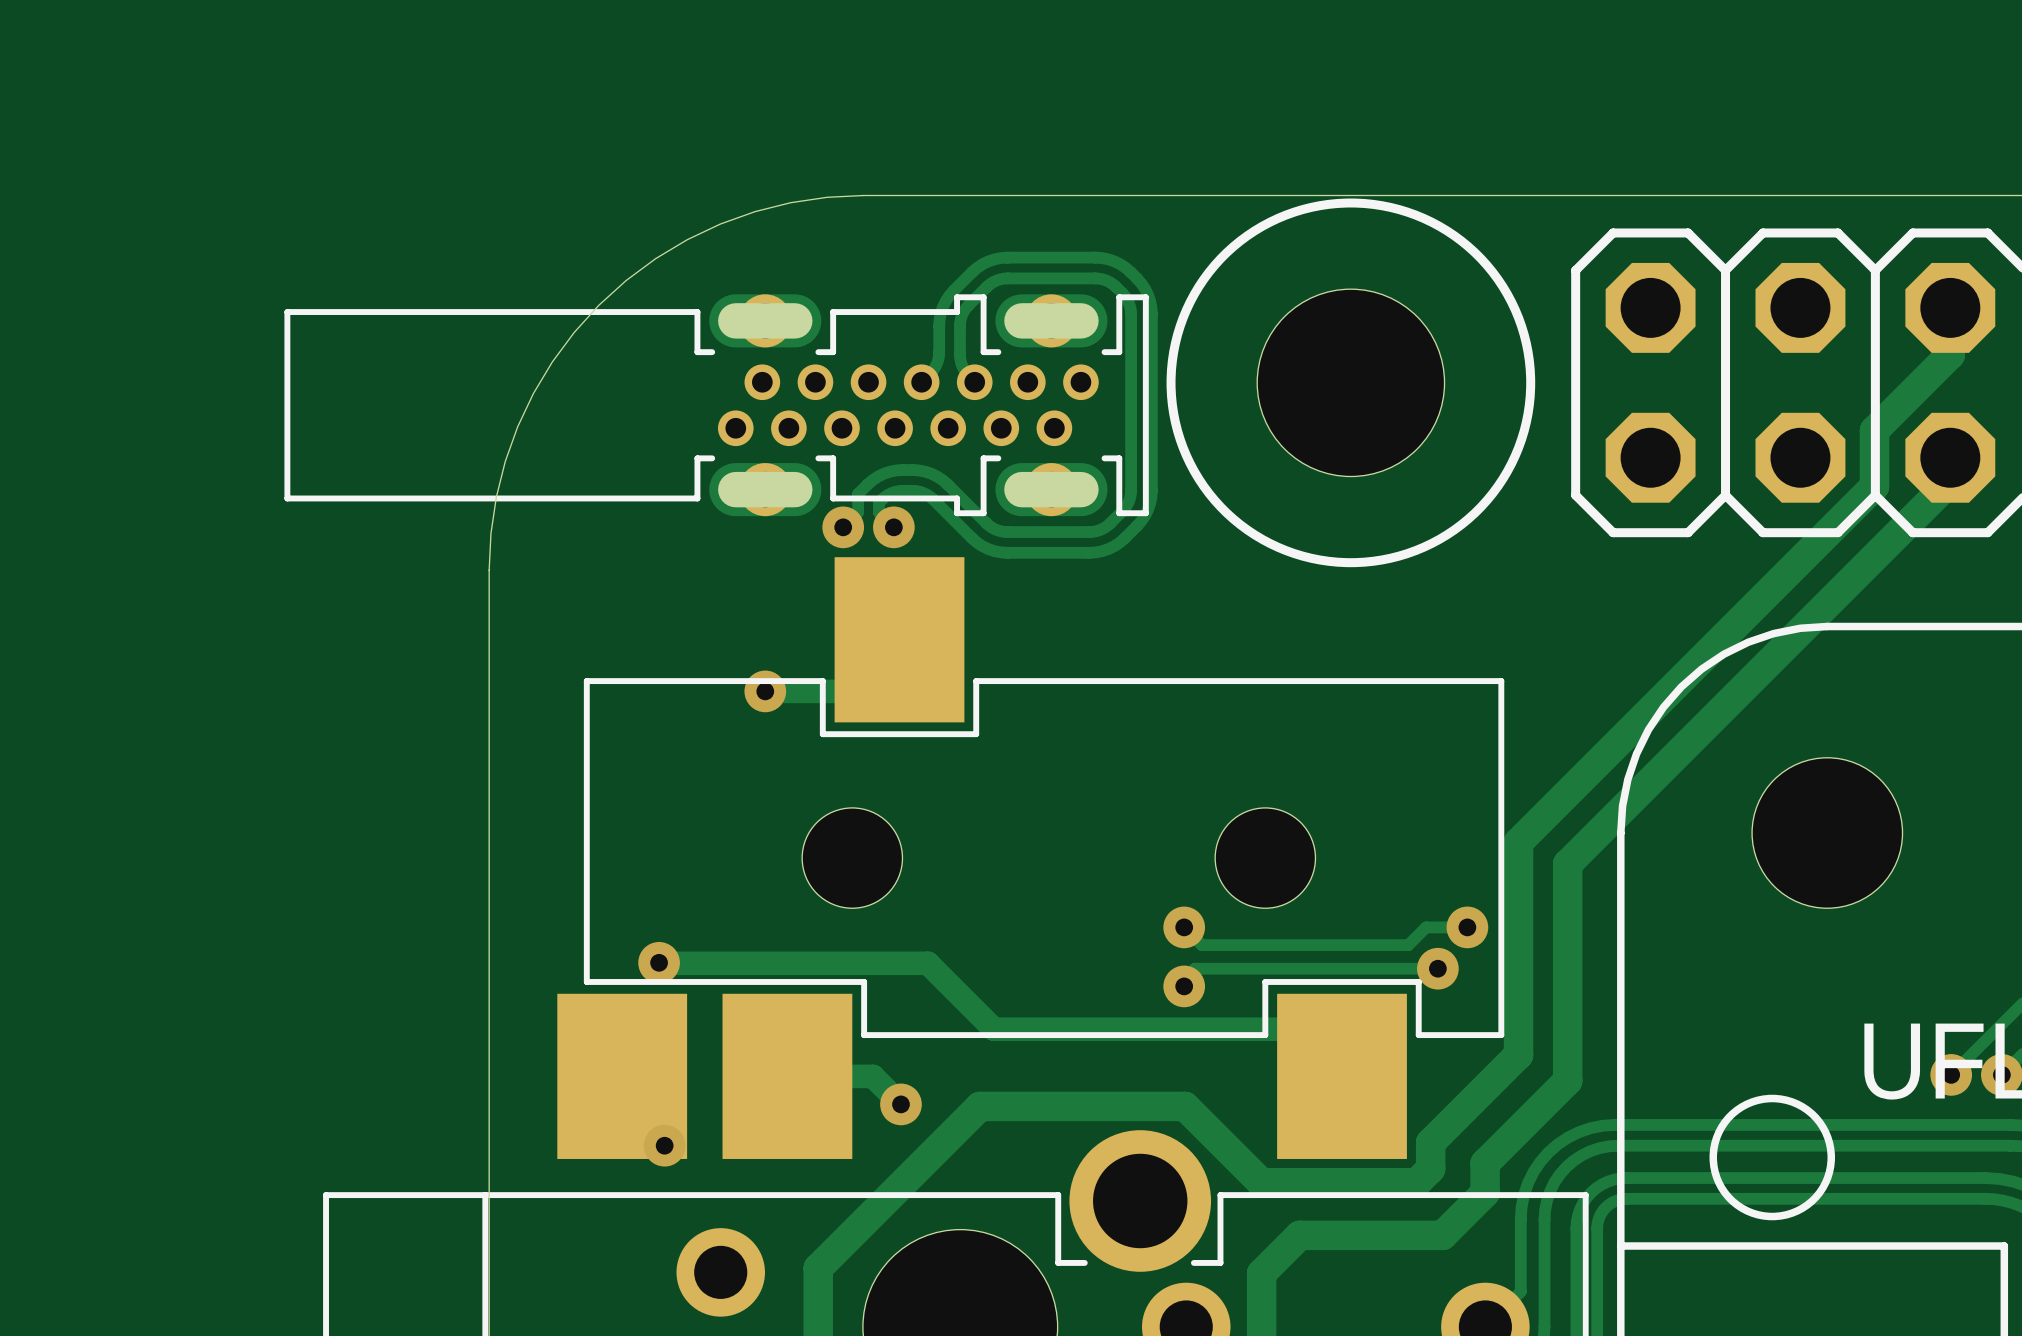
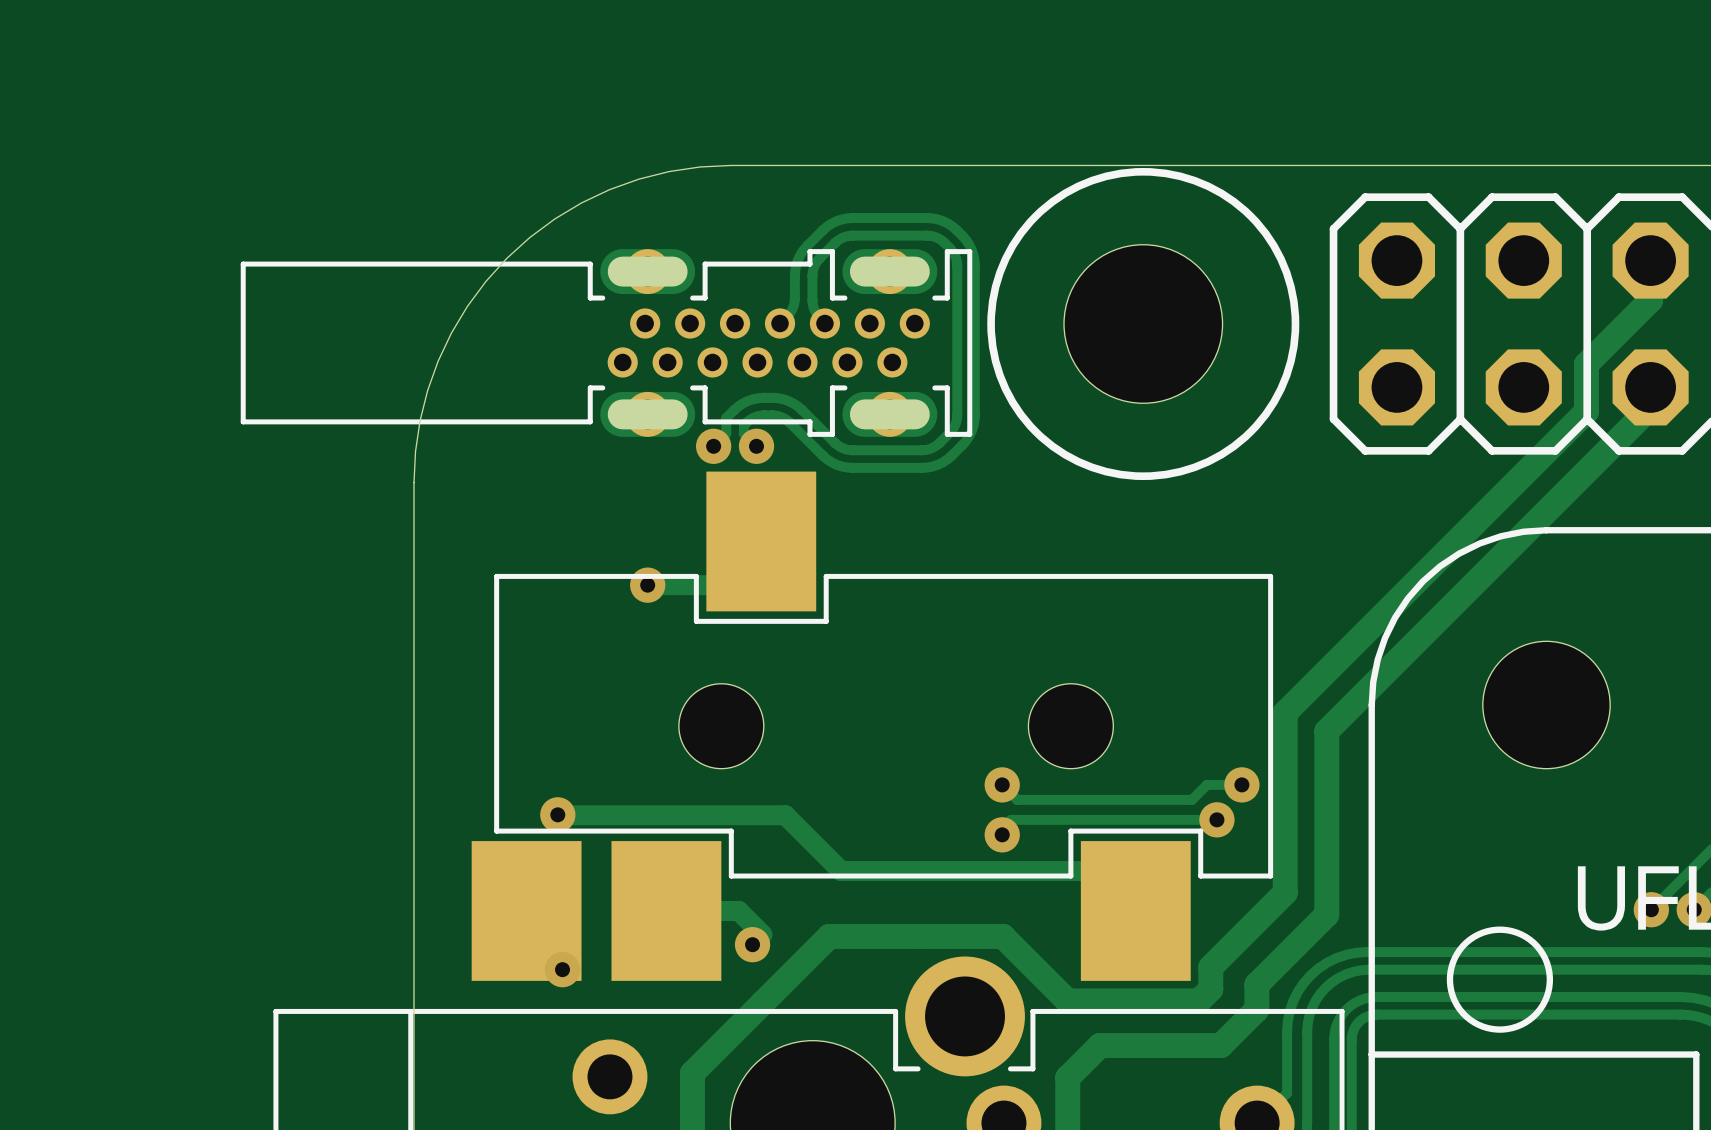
via position: (900, 1104) -> (752, 944)

